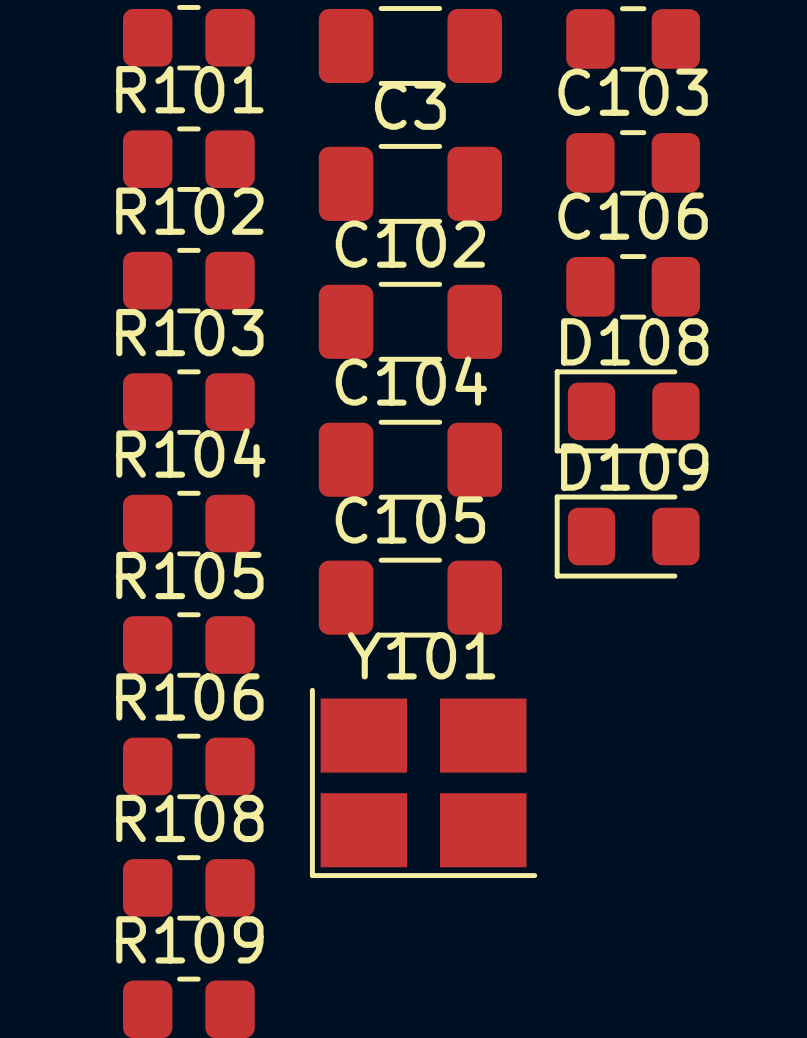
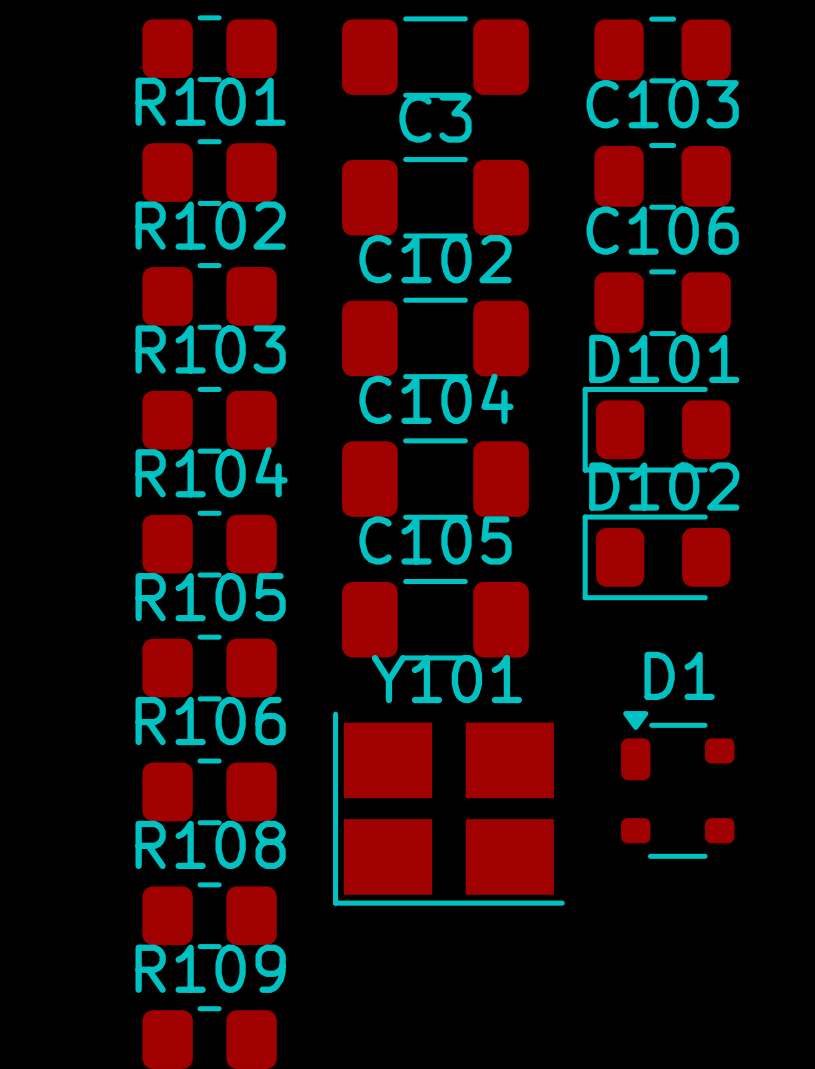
D108 name: D108 (634, 341) -> D101 (664, 358)
D109 name: D109 (634, 467) -> D102 (664, 486)
D1: none -> (677, 784)

